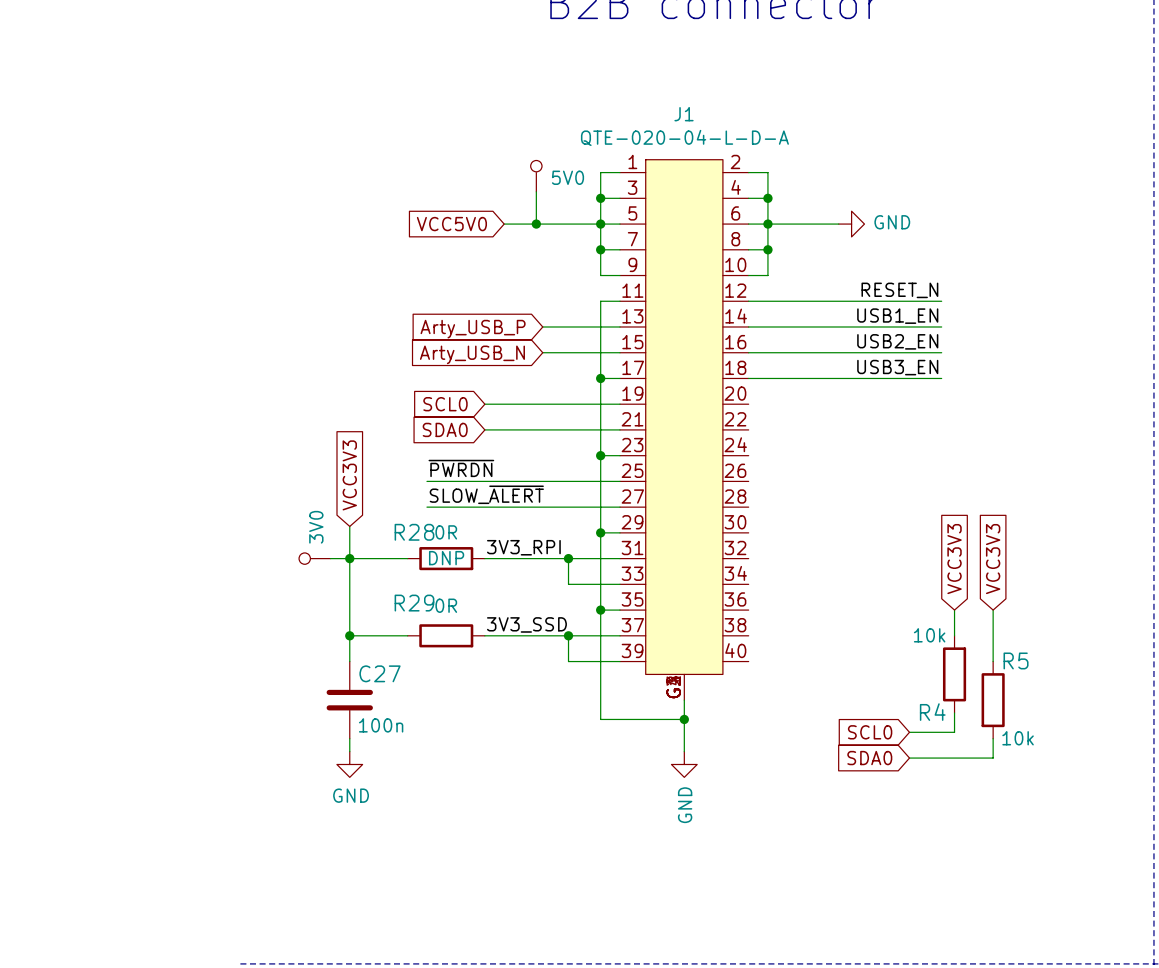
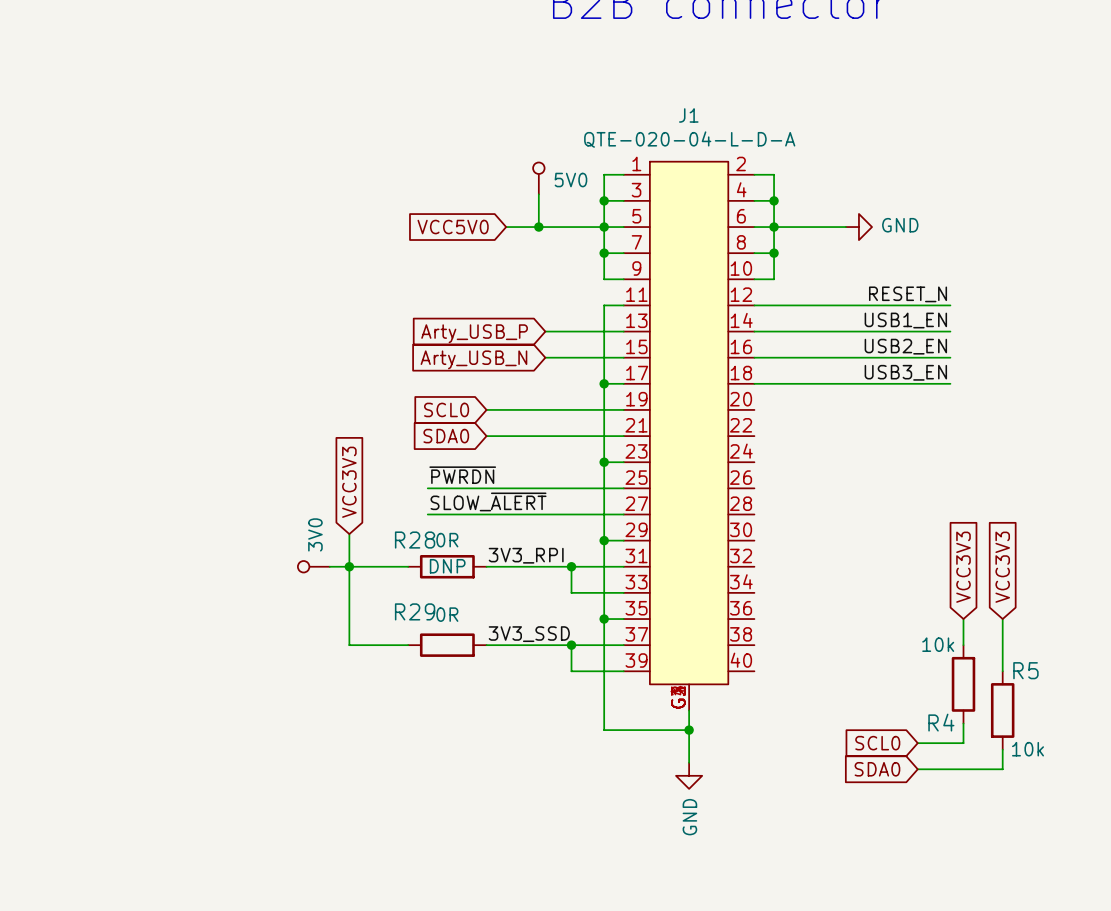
wire: (349, 635) (349, 661) -> none
junction: (349, 635) -> none
C27: (349, 700) -> none
wire: (349, 738) (349, 751) -> none
power symbol: GND (349, 764) -> none

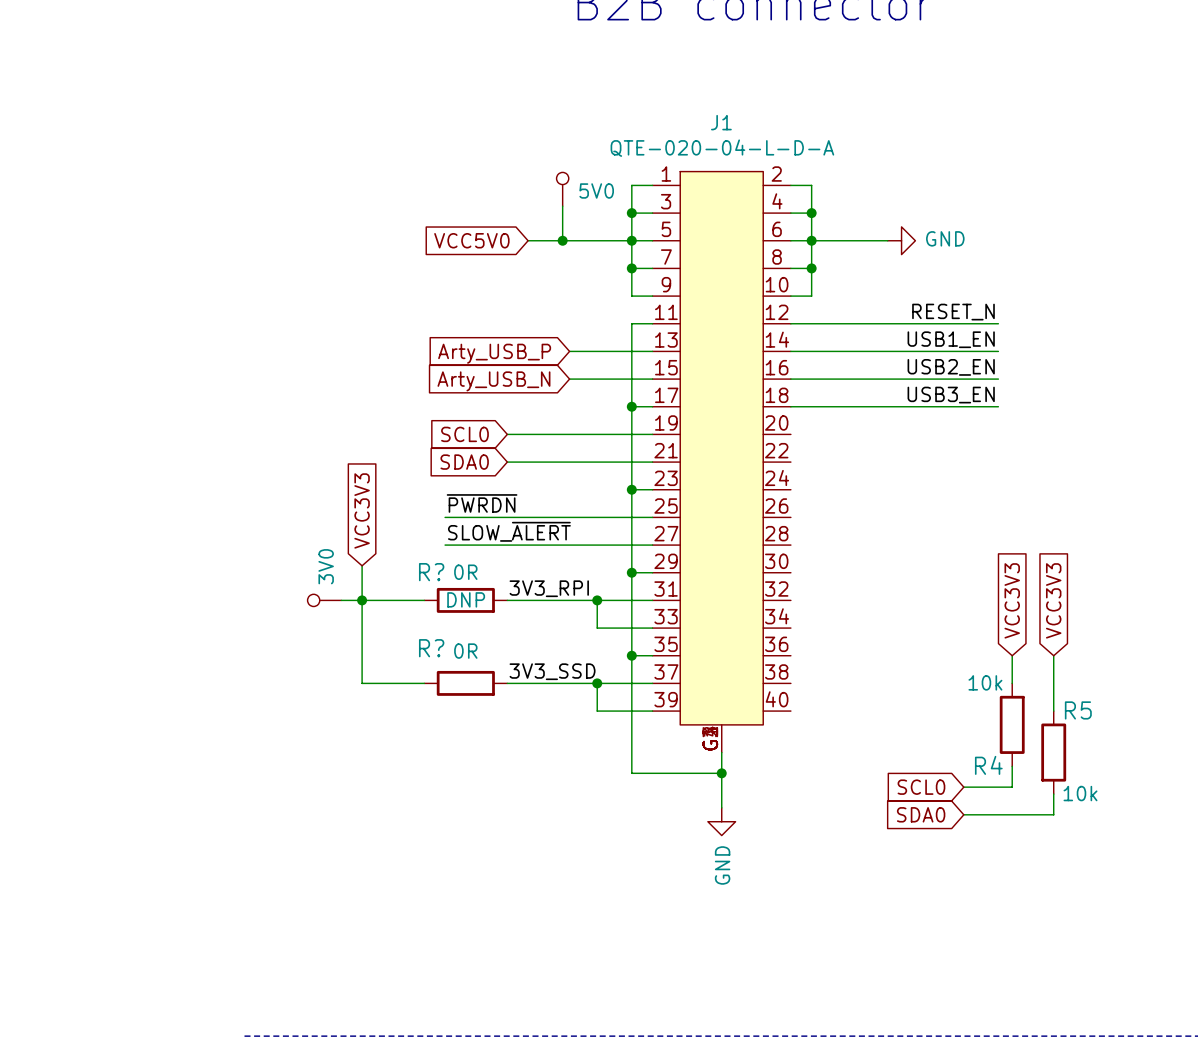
R28 name: R28 (415, 540) -> R? (431, 572)
R29 name: R29 (415, 611) -> R? (431, 648)

